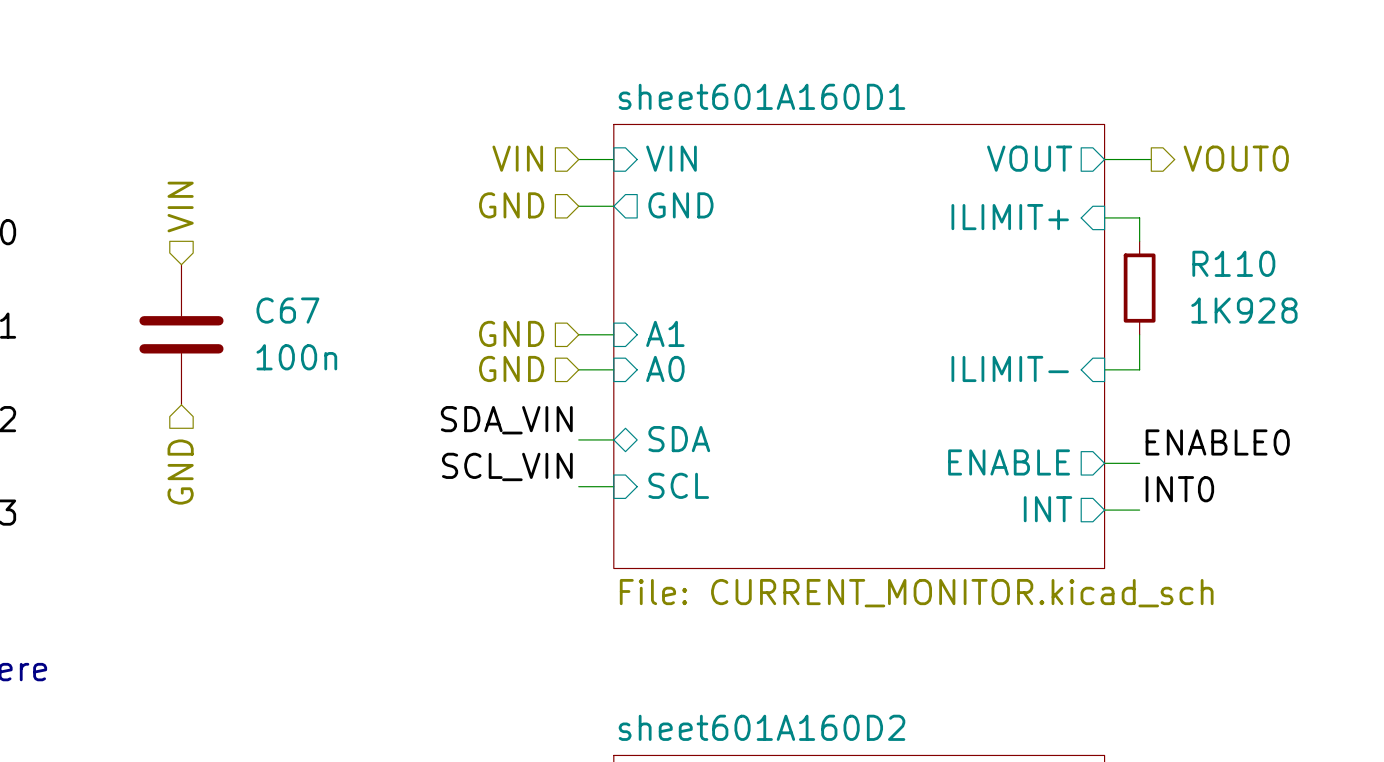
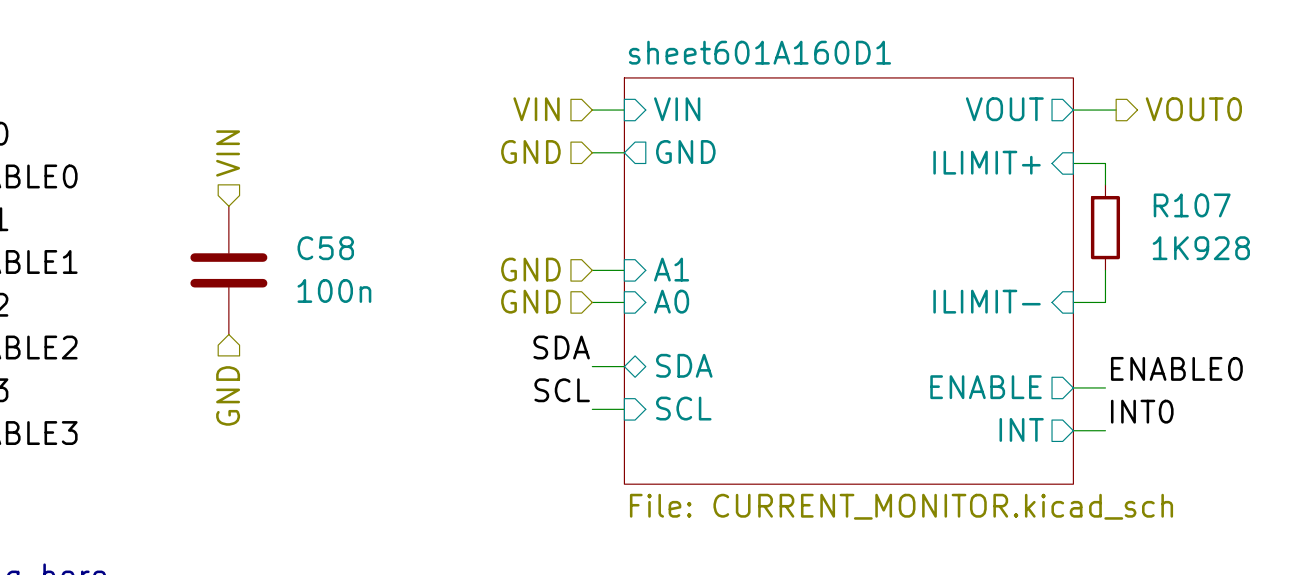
R110 name: R110 (1233, 263) -> R107 (1192, 205)
C67 name: C67 (287, 310) -> C58 (325, 248)
label: SDA_VIN (506, 420) -> SDA (561, 347)
label: SCL_VIN (507, 466) -> SCL (562, 390)

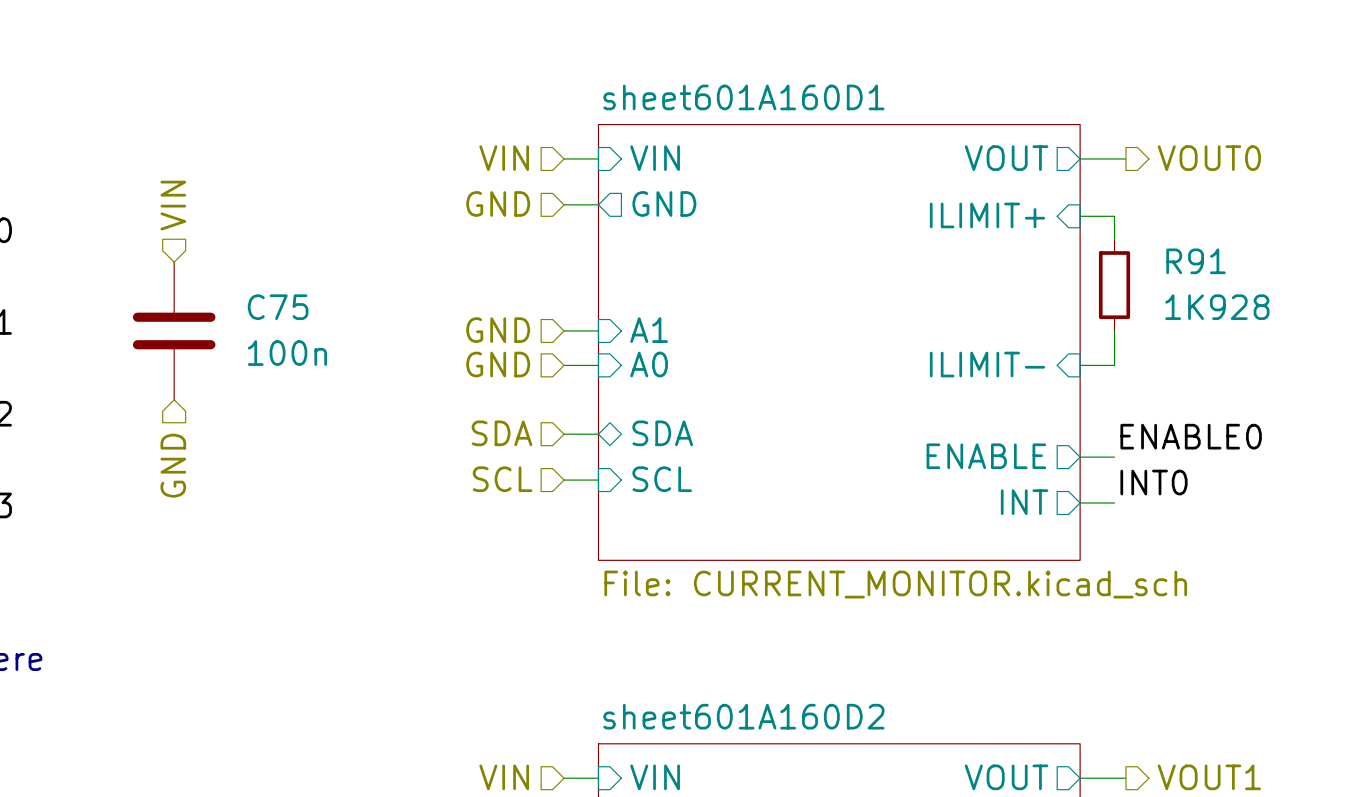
R107 name: R107 (1192, 205) -> R91 (1196, 261)
C58 name: C58 (325, 248) -> C75 (278, 307)
label: SDA (561, 347) -> none
hierarchical label: none -> SDA (502, 433)
label: SCL (562, 390) -> none
hierarchical label: none -> SCL (502, 479)

